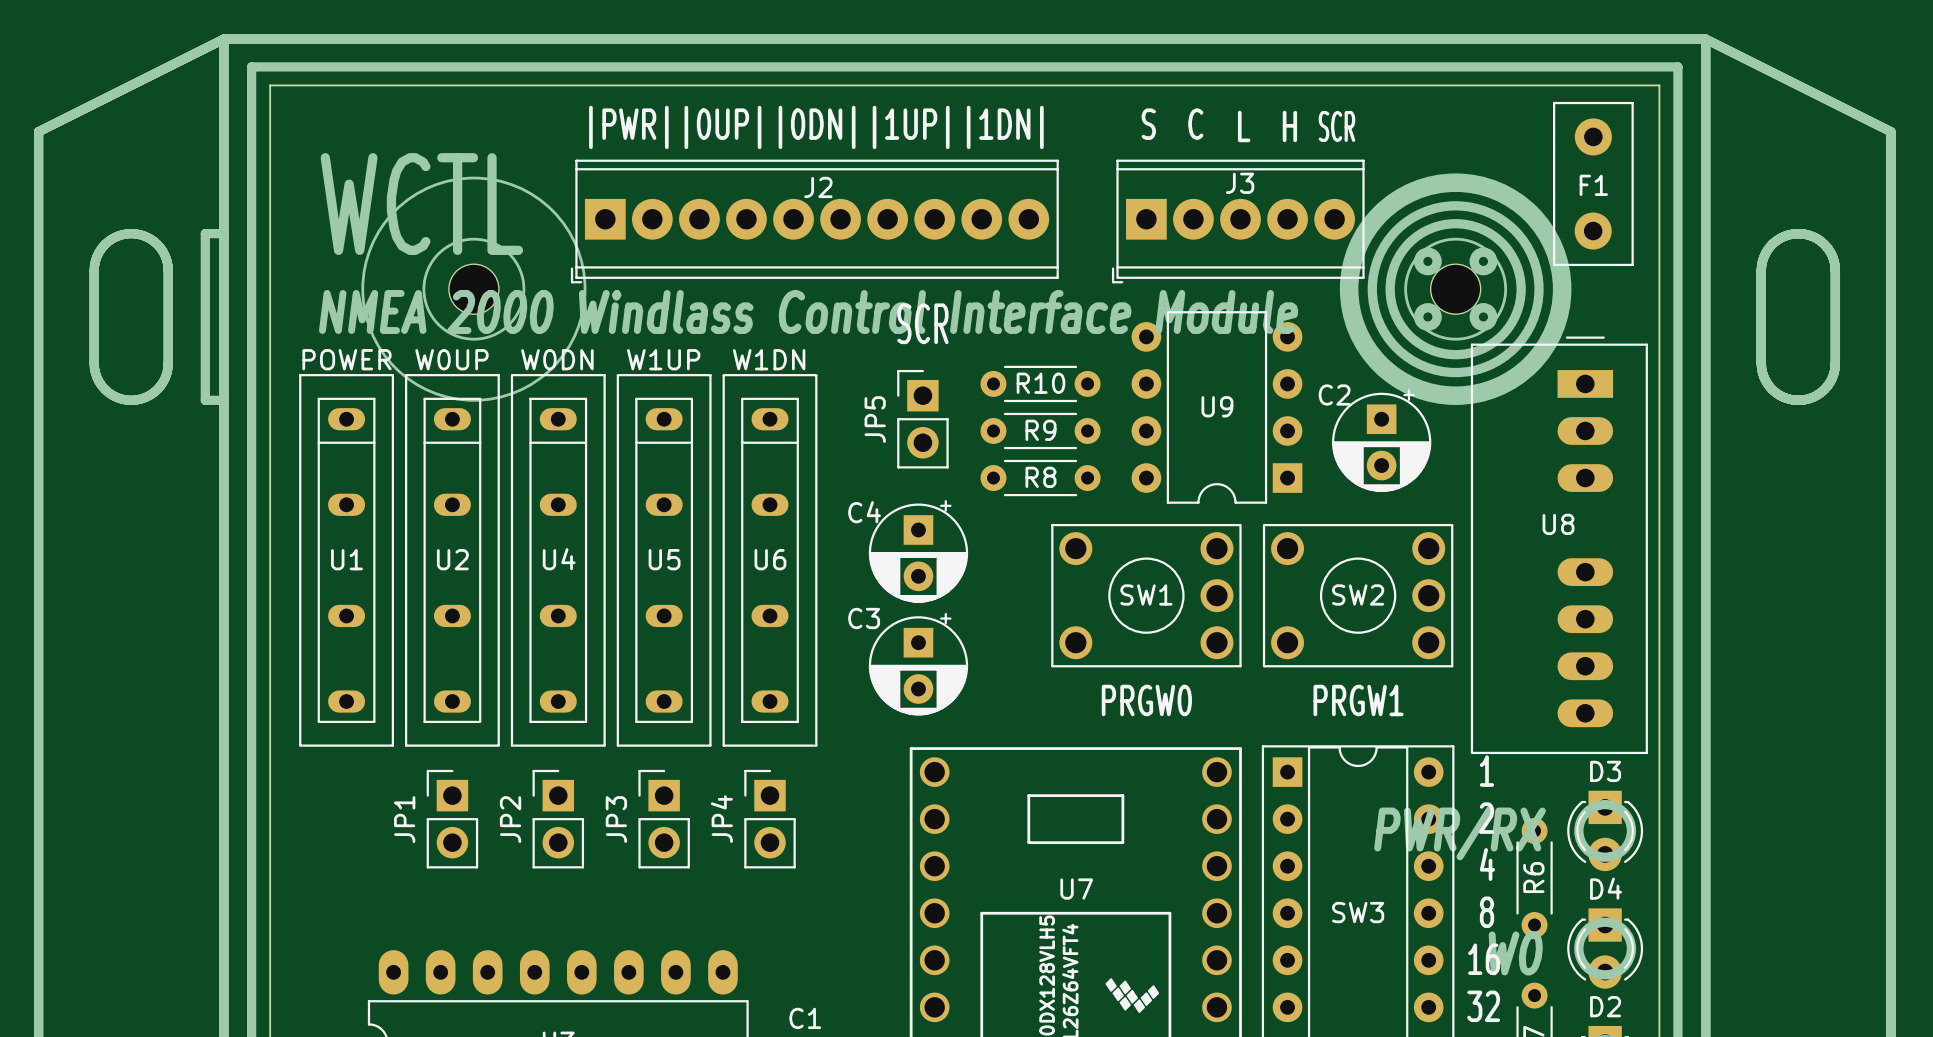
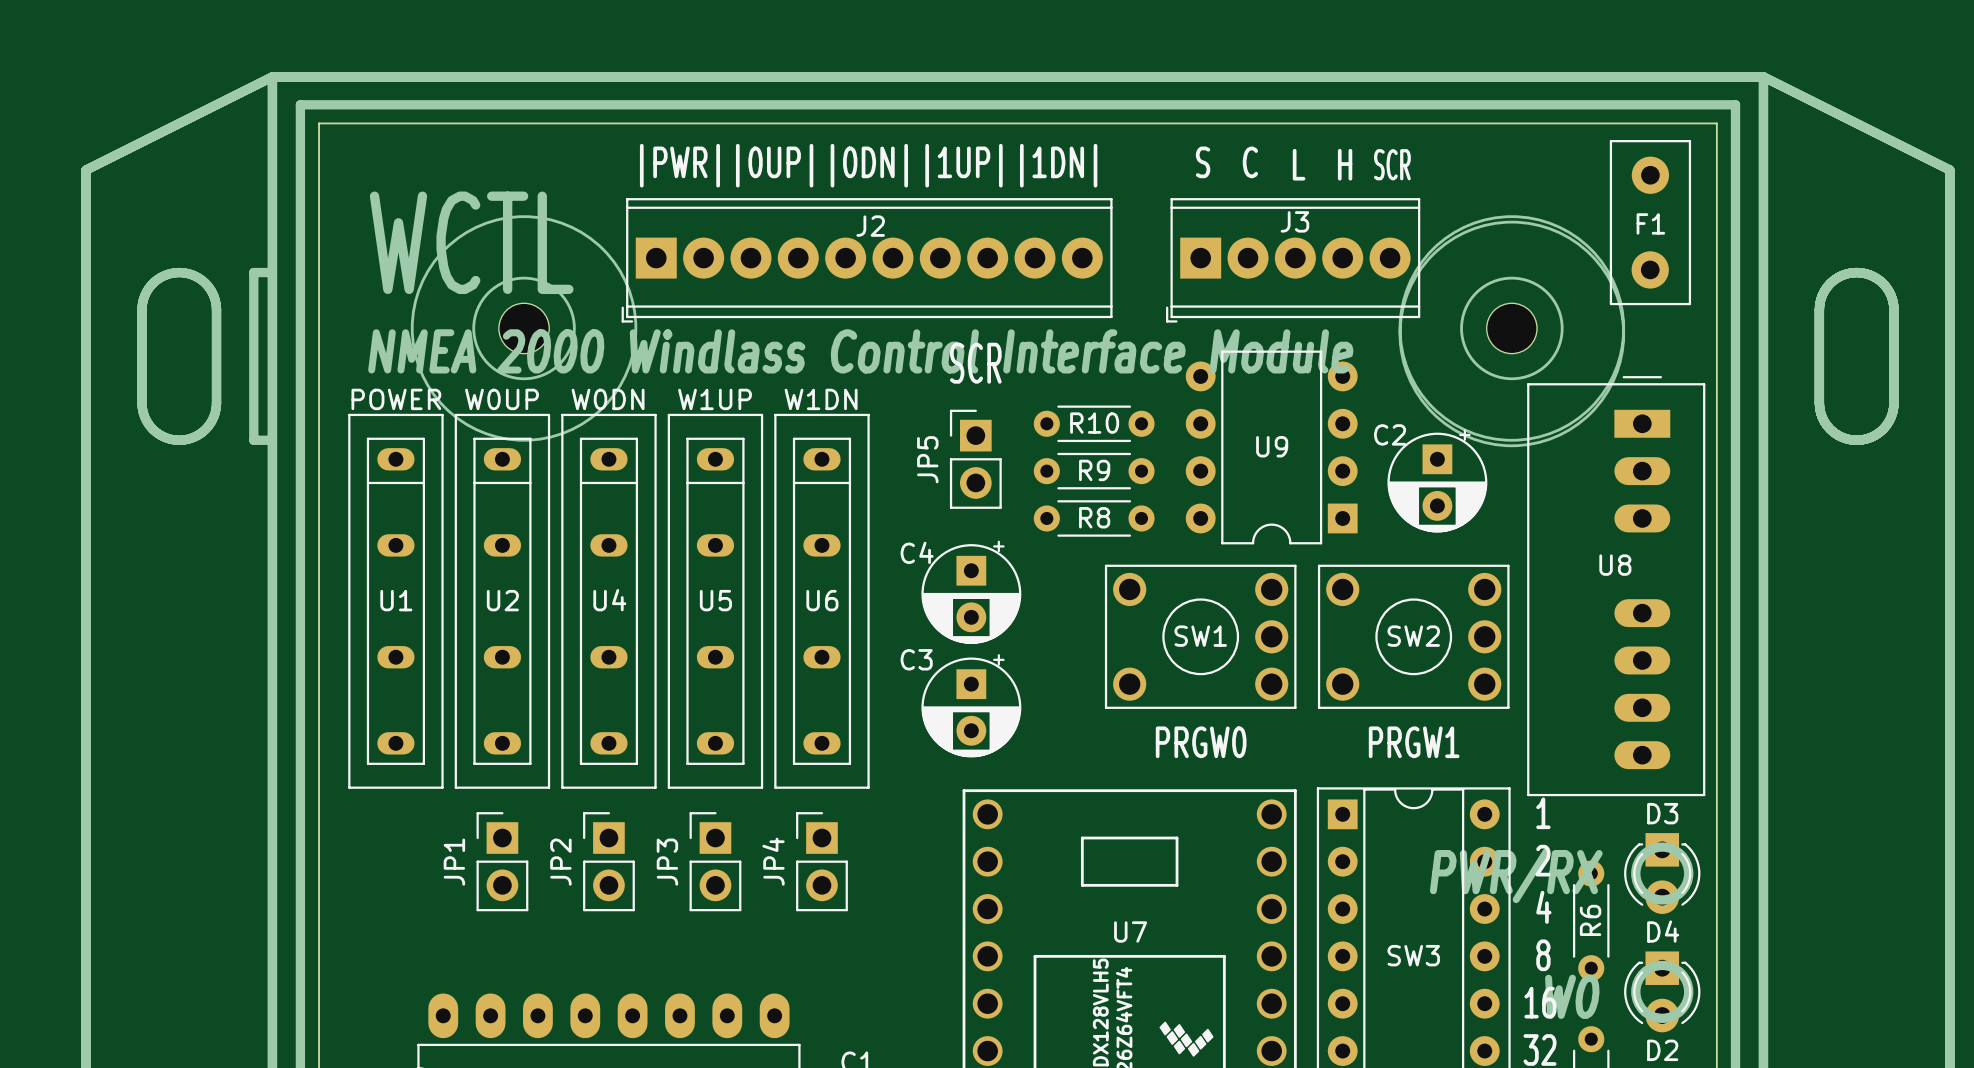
drawing: [1339, 173, 1572, 405] -> none
drawing: none -> [1398, 220, 1626, 448]

